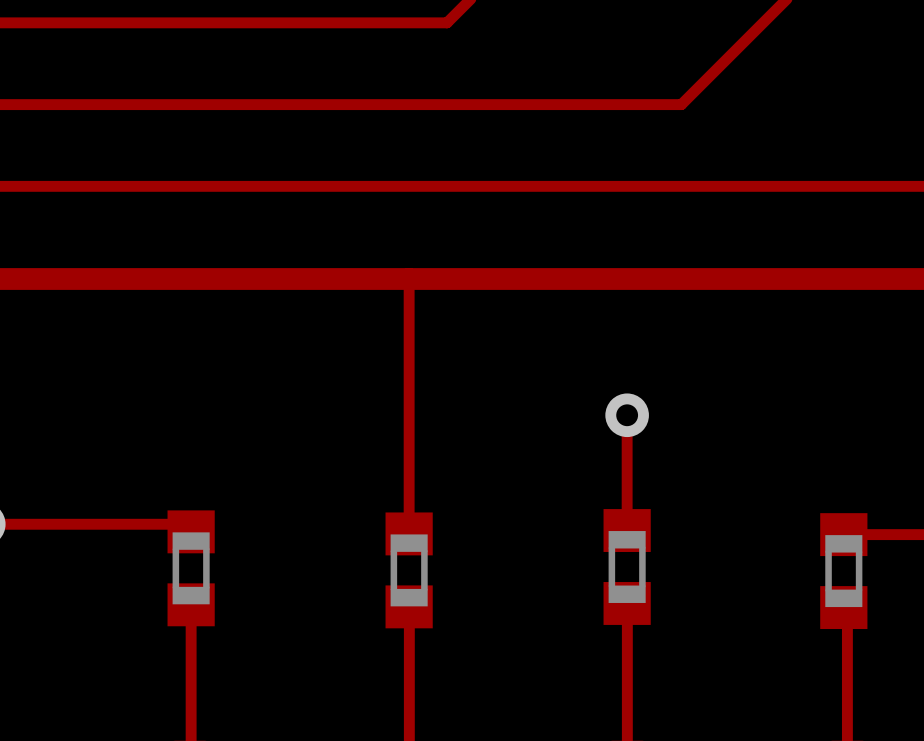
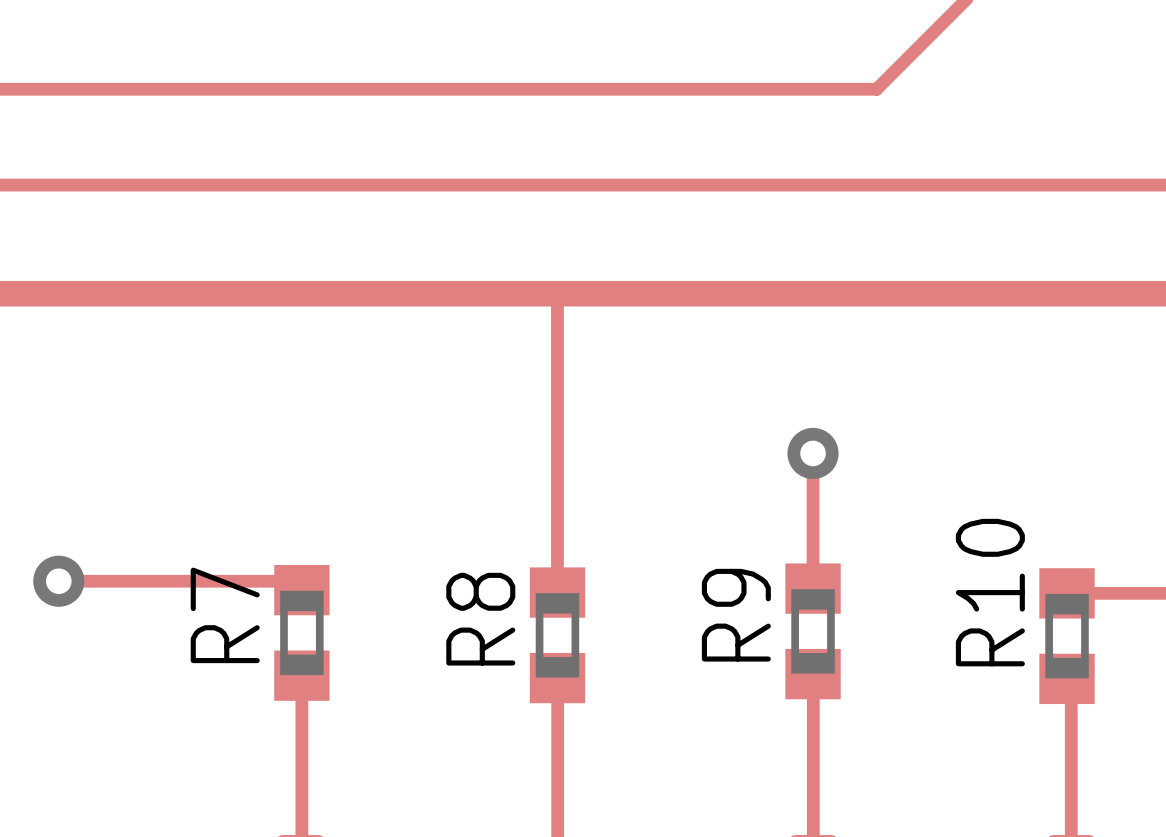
R10 name: none -> R10 (990, 592)
R7 name: none -> R7 (225, 615)
R9 name: none -> R9 (736, 615)
R8 name: none -> R8 (480, 619)

